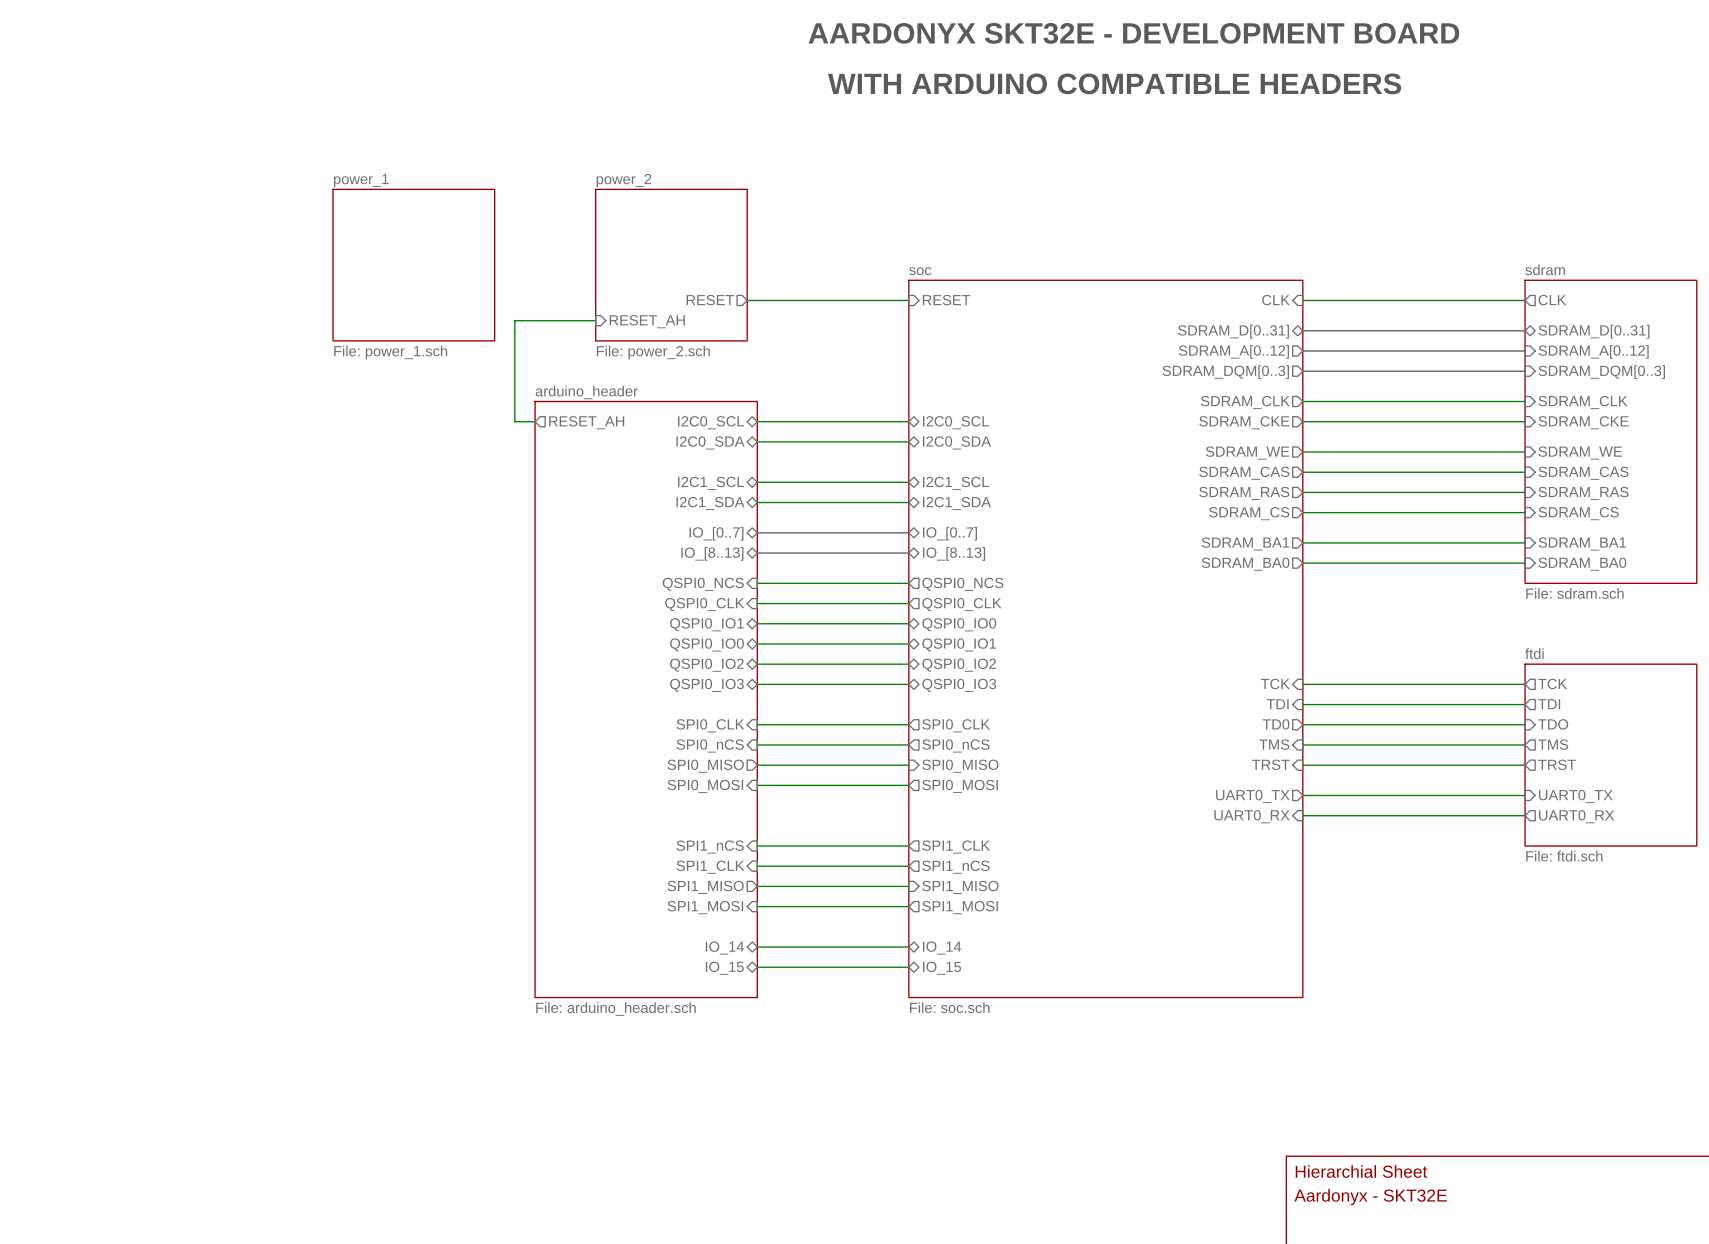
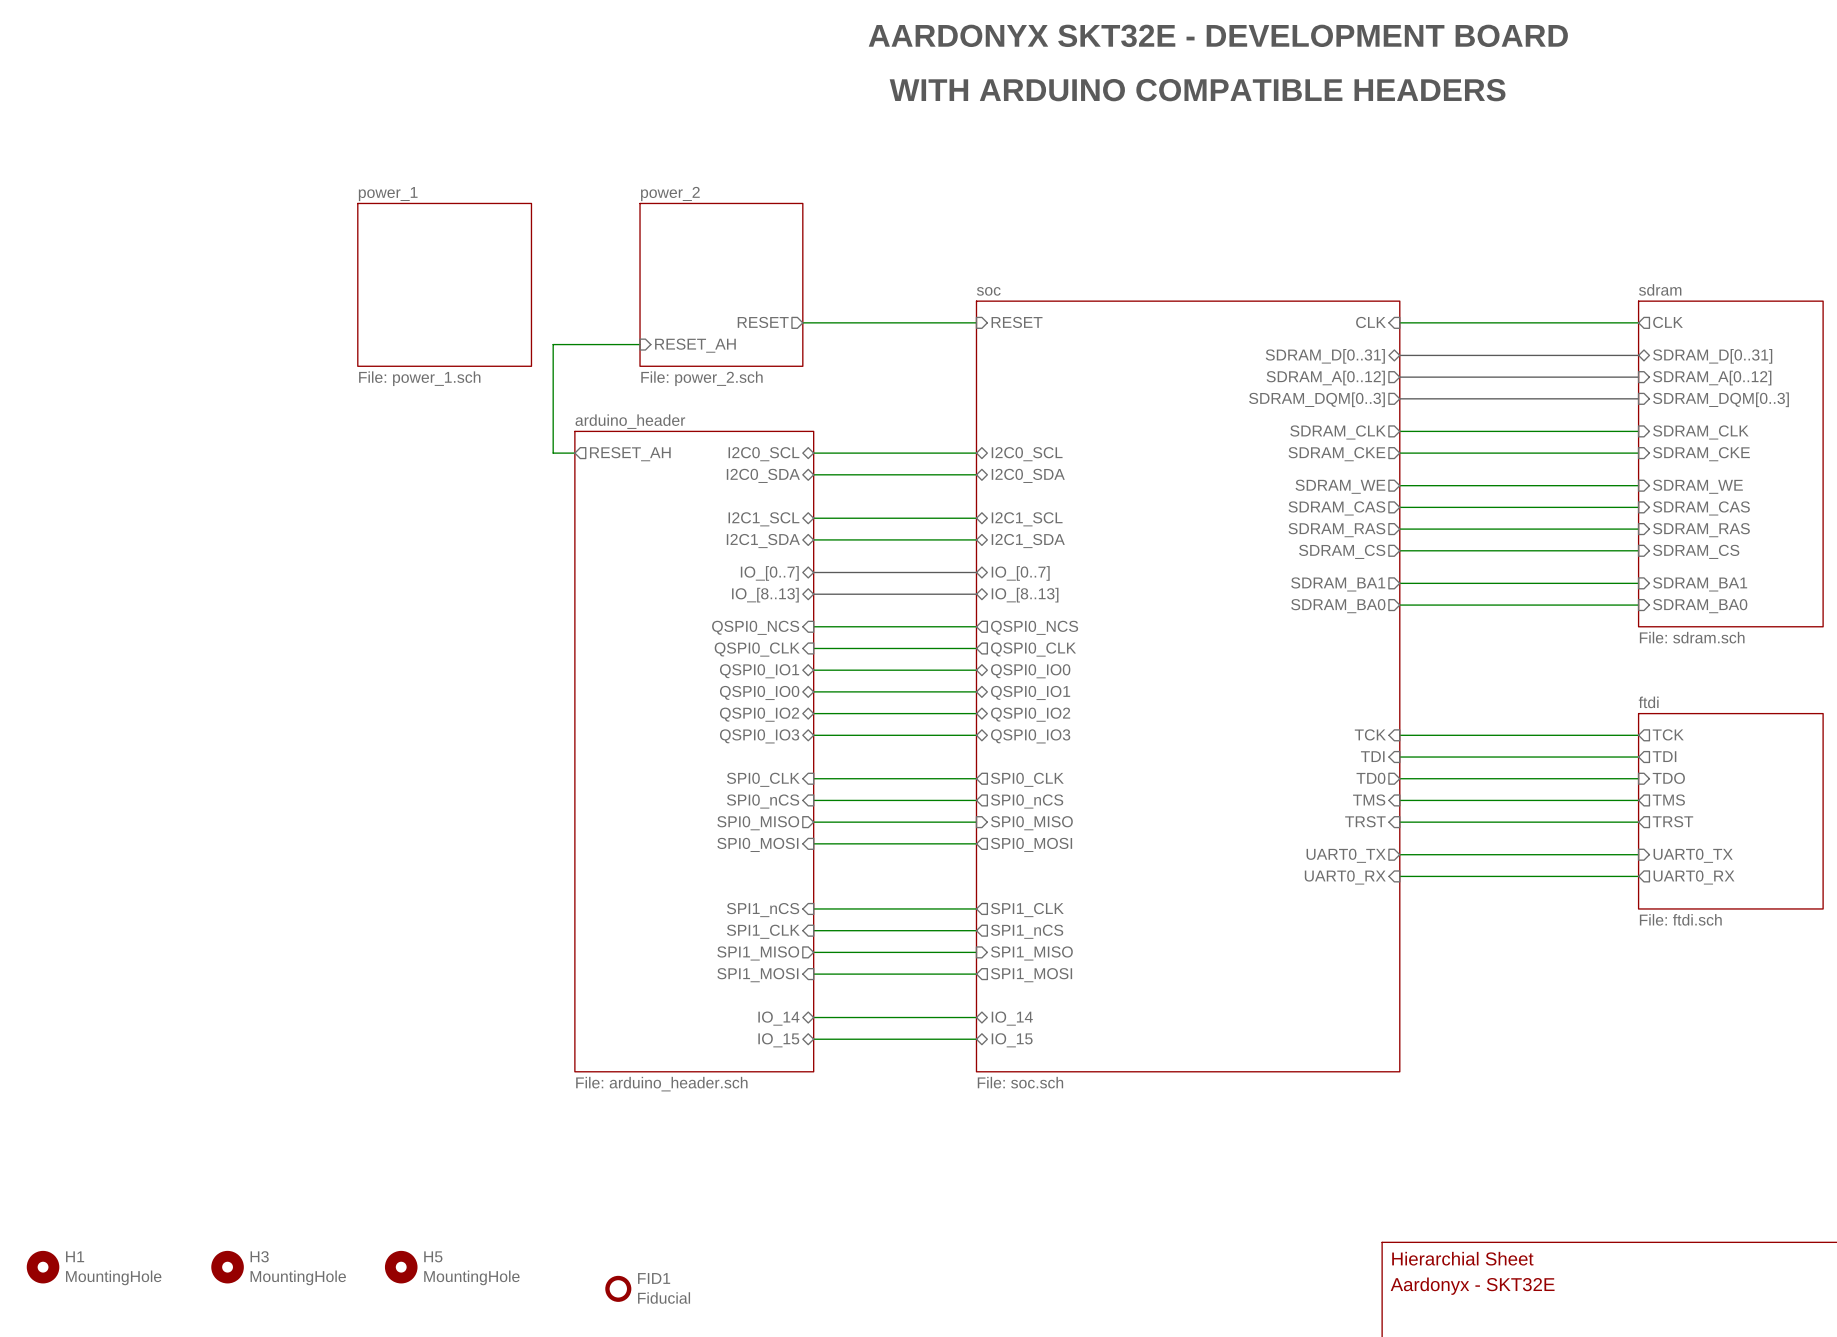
H1: none -> MountingHole (43, 1267)
H3: none -> MountingHole (227, 1267)
H5: none -> MountingHole (401, 1267)
FID1: none -> Fiducial (618, 1288)

